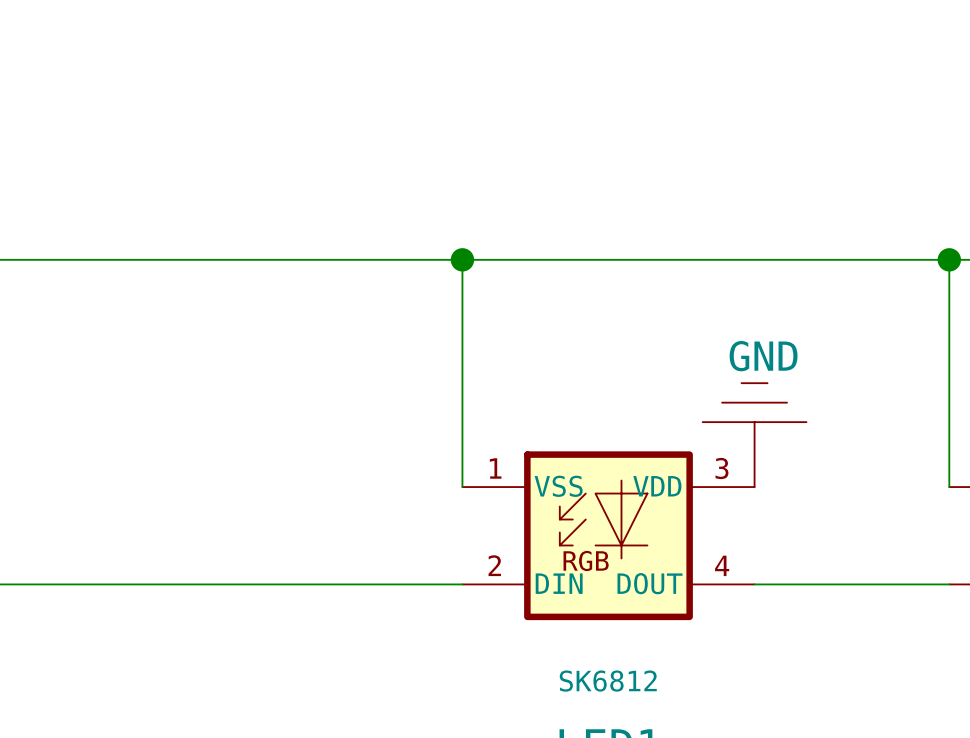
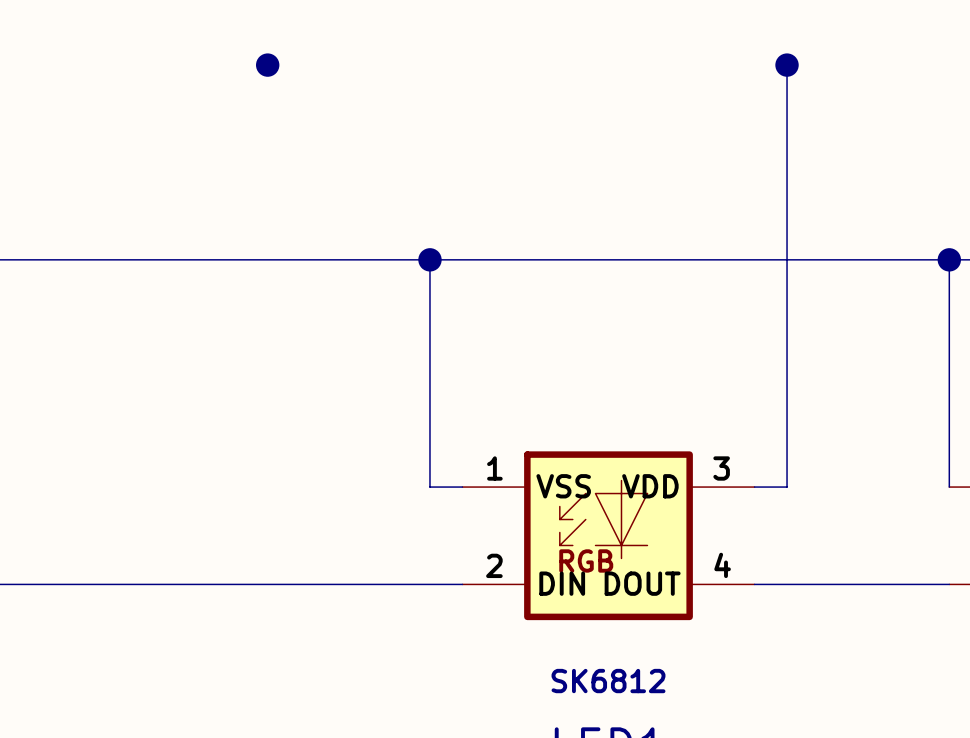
junction: none -> (267, 65)
wire: none -> (787, 65) (787, 487) (754, 487)
junction: none -> (787, 65)
wire: (462, 259) (462, 487) -> (429, 259) (429, 487) (462, 487)
junction position: (462, 259) -> (429, 259)
power symbol: GND (754, 435) -> none

